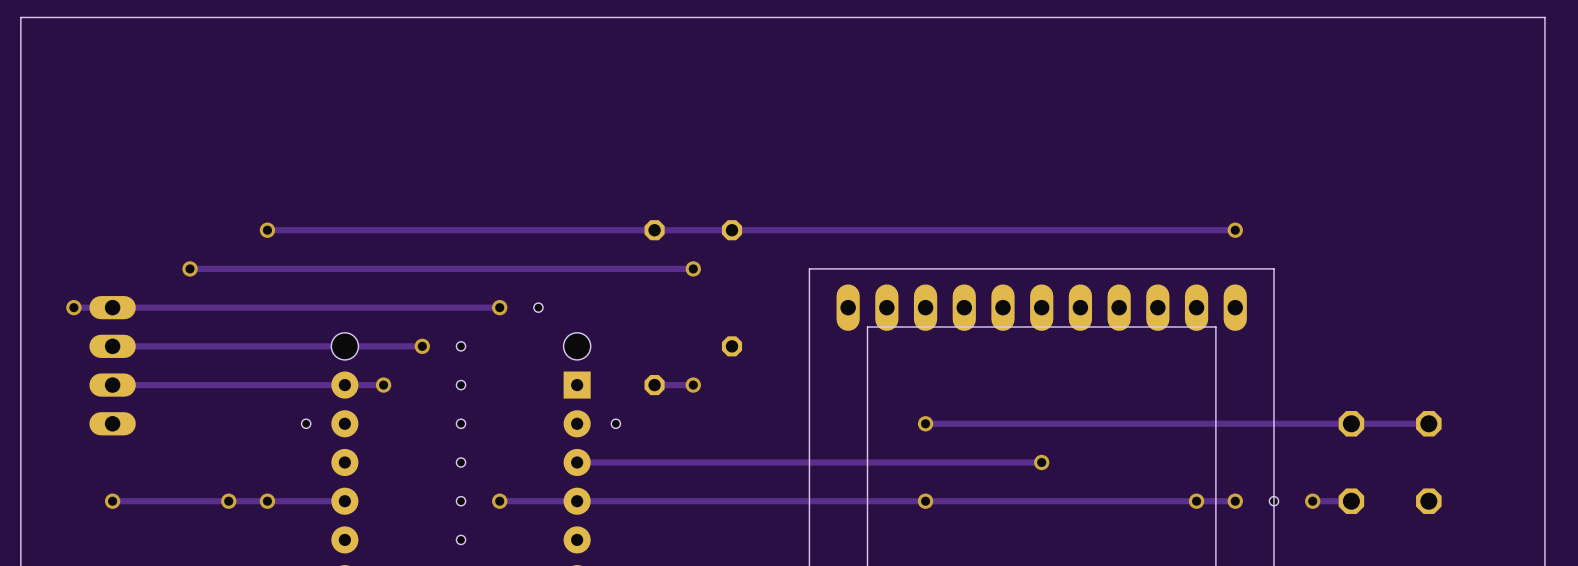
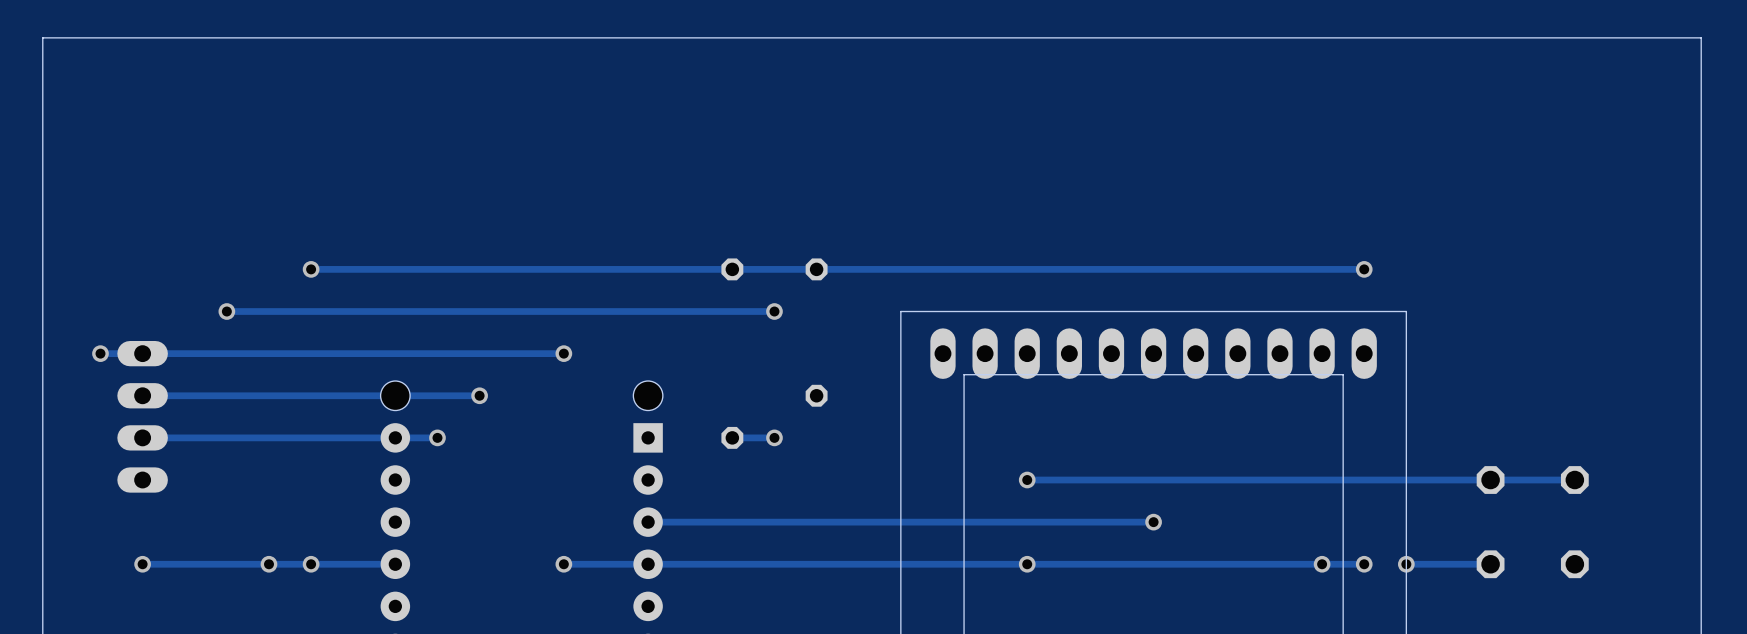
hole: (538, 307) -> none
hole: (461, 346) -> none
hole: (461, 385) -> none
hole: (306, 423) -> none
hole: (461, 423) -> none
hole: (615, 423) -> none
hole: (461, 462) -> none
hole: (461, 501) -> none
hole: (1273, 501) -> none
track: none -> (1448, 564) (1406, 564)
via position: (1312, 501) -> (1406, 564)
hole: (461, 539) -> none

